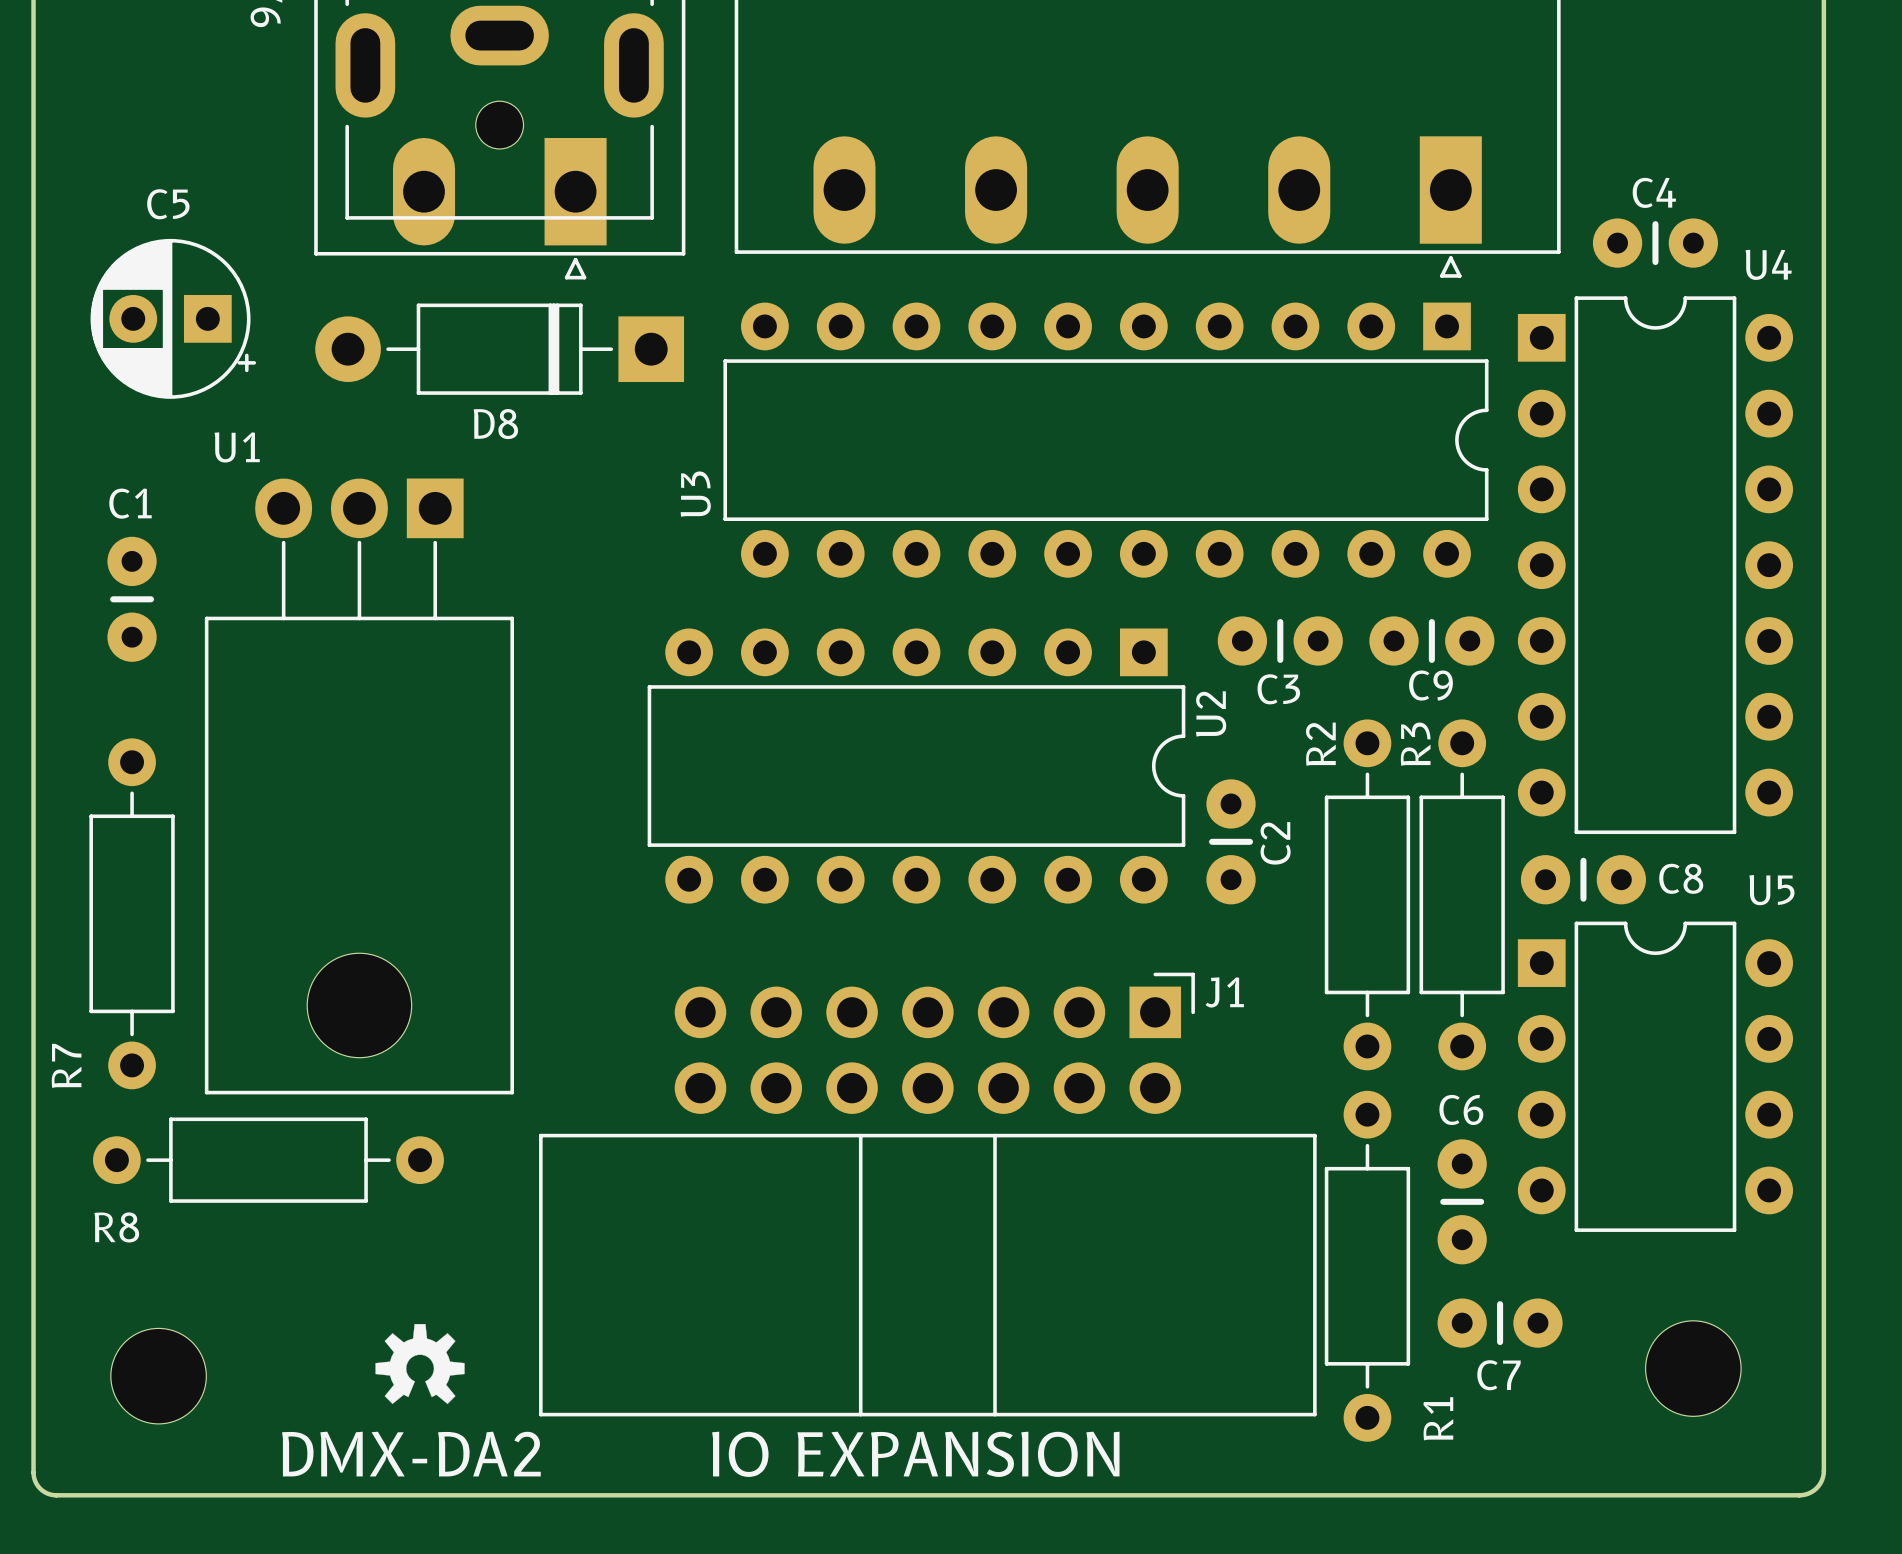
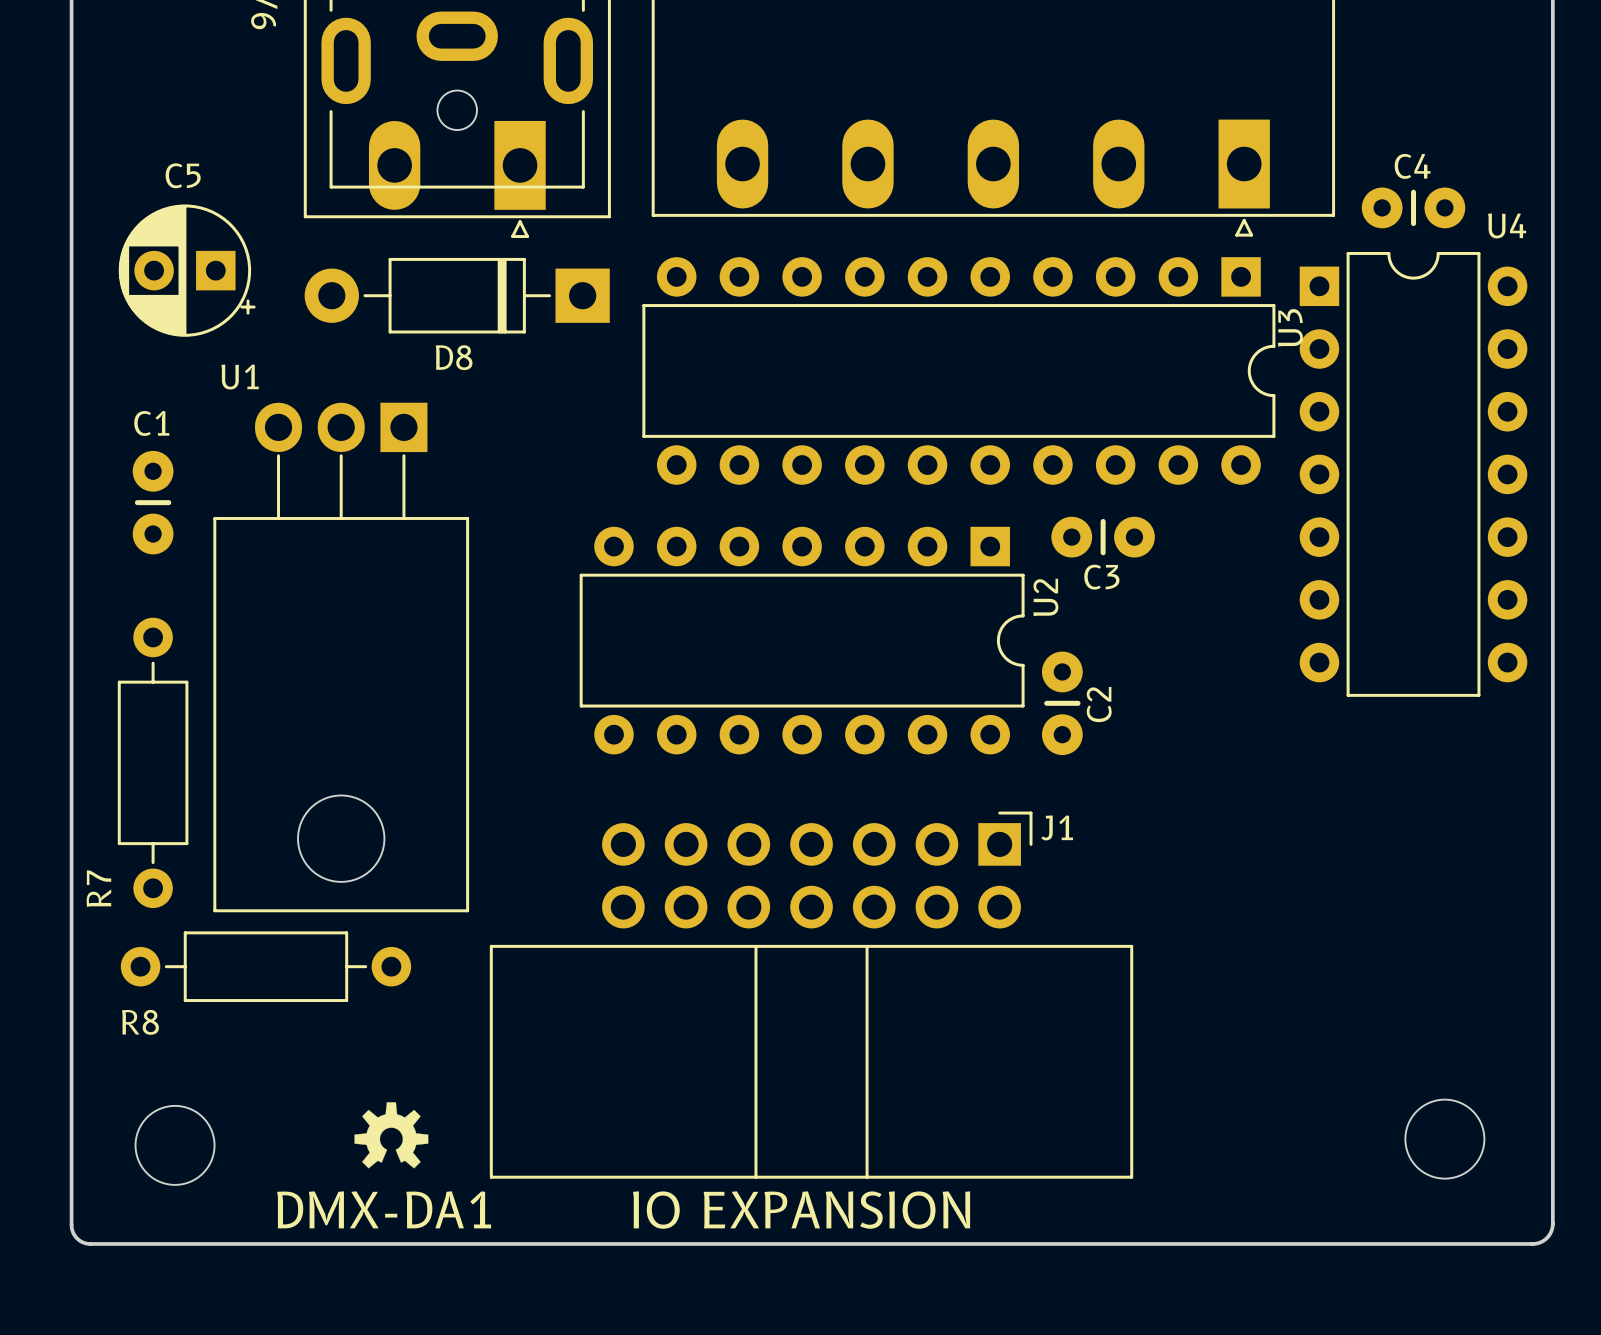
U3 name position: U3 (695, 494) -> U3 (1290, 327)
C9: (1431, 640) -> none
C8: (1583, 879) -> none
R2: (1367, 894) -> none
R3: (1462, 894) -> none
U5: (1655, 1076) -> none
C6: (1462, 1201) -> none
R1: (1367, 1266) -> none
C7: (1500, 1323) -> none
text: DMX-DA2 (411, 1454) -> DMX-DA1 (384, 1209)

